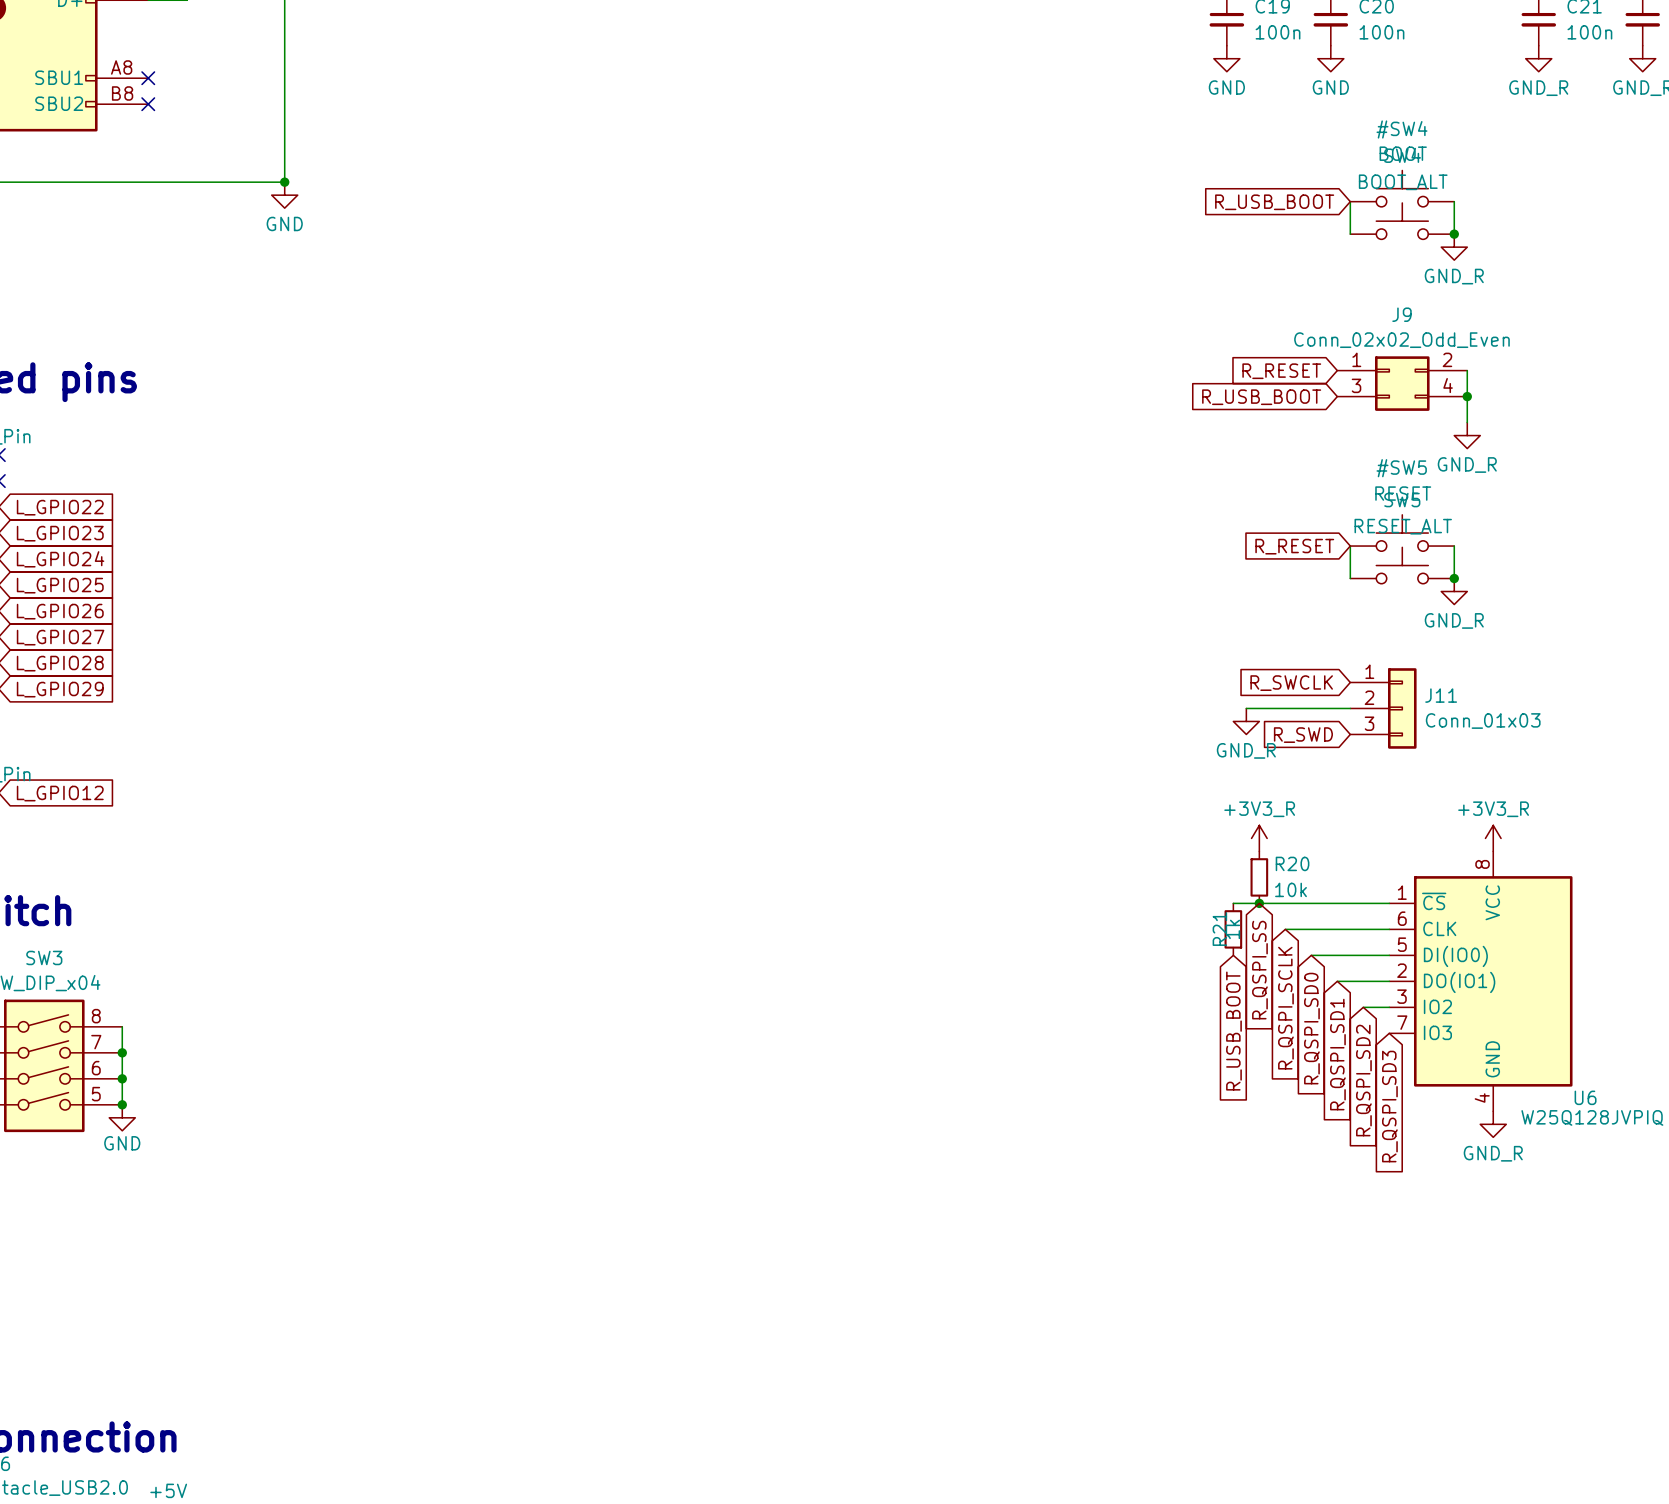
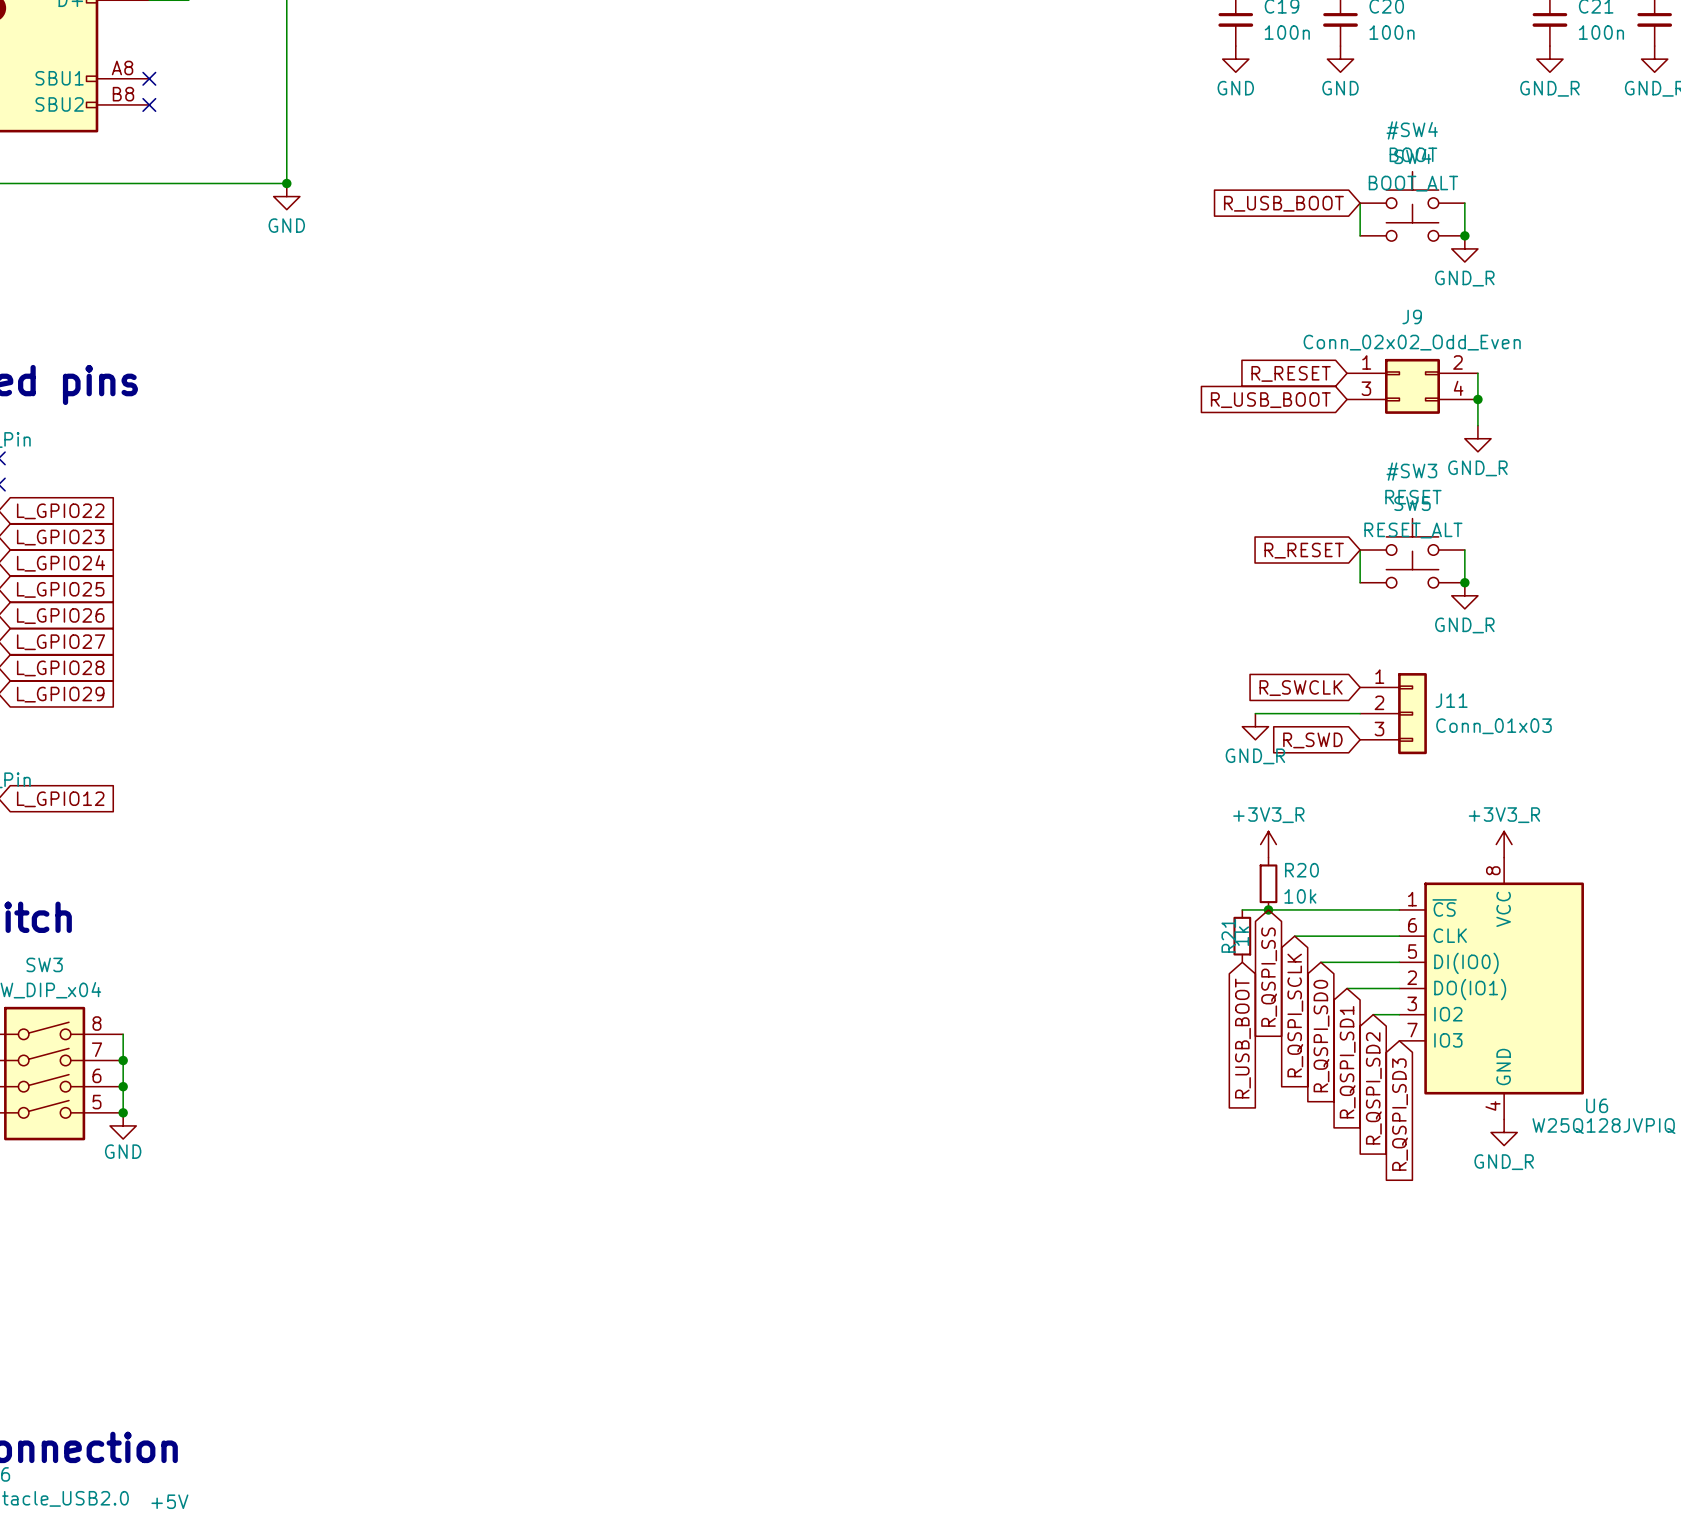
#SW5 name: #SW5 (1401, 468) -> #SW3 (1411, 471)

